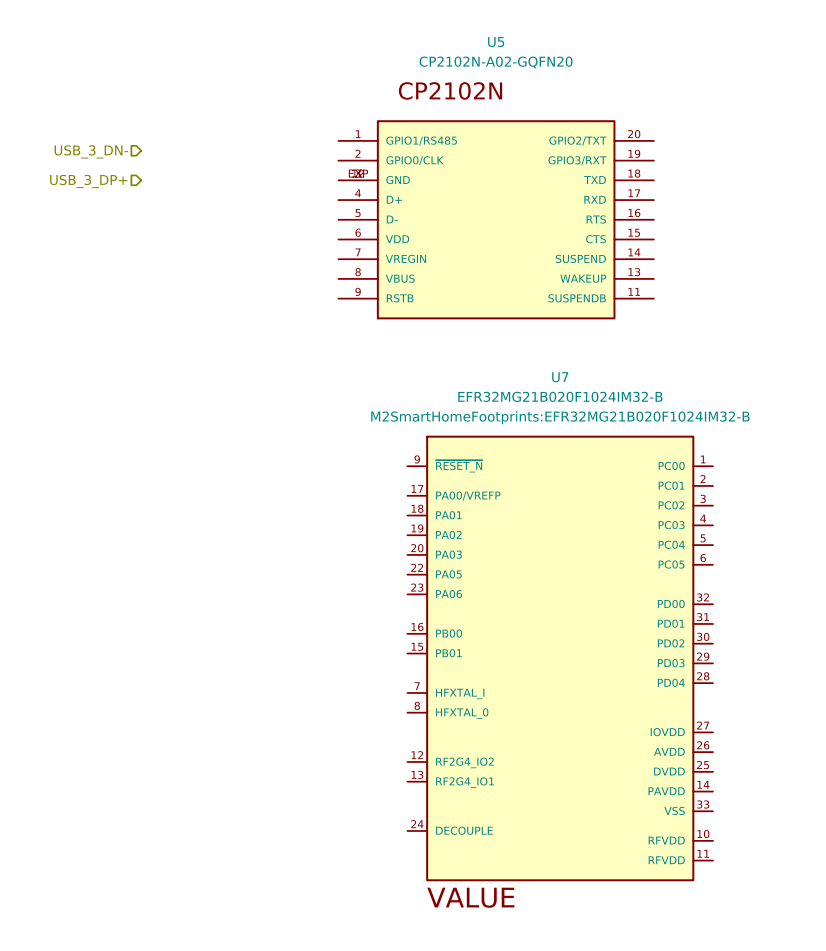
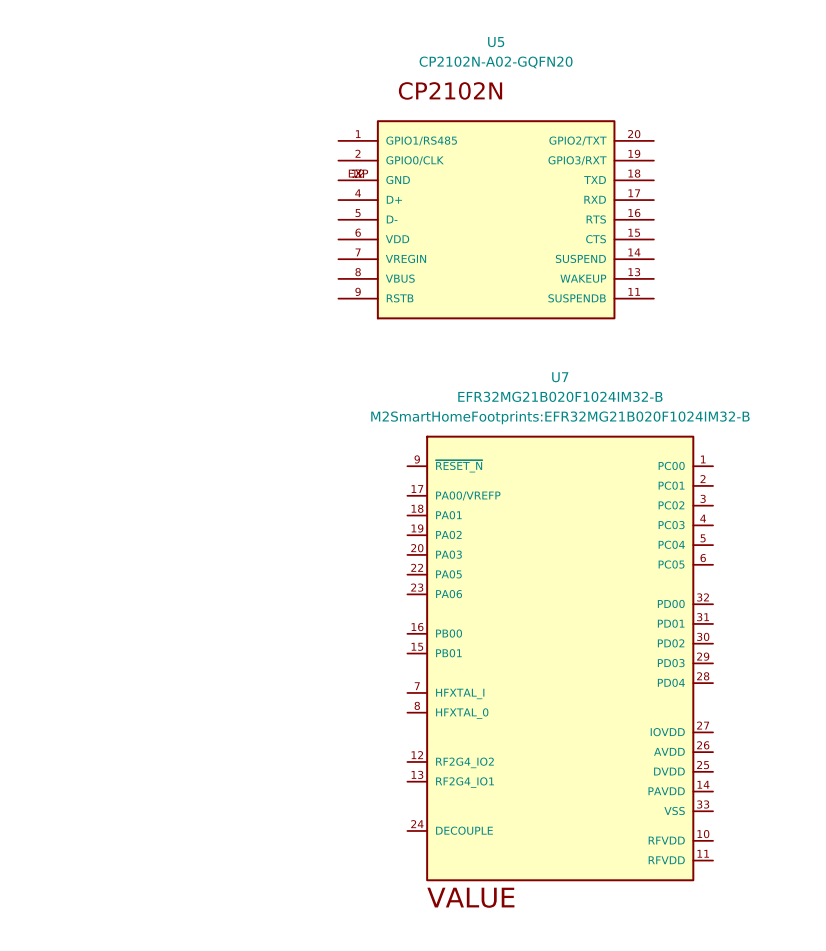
hierarchical label: USB_3_DN- (91, 151) -> none
hierarchical label: USB_3_DP+ (88, 181) -> none

